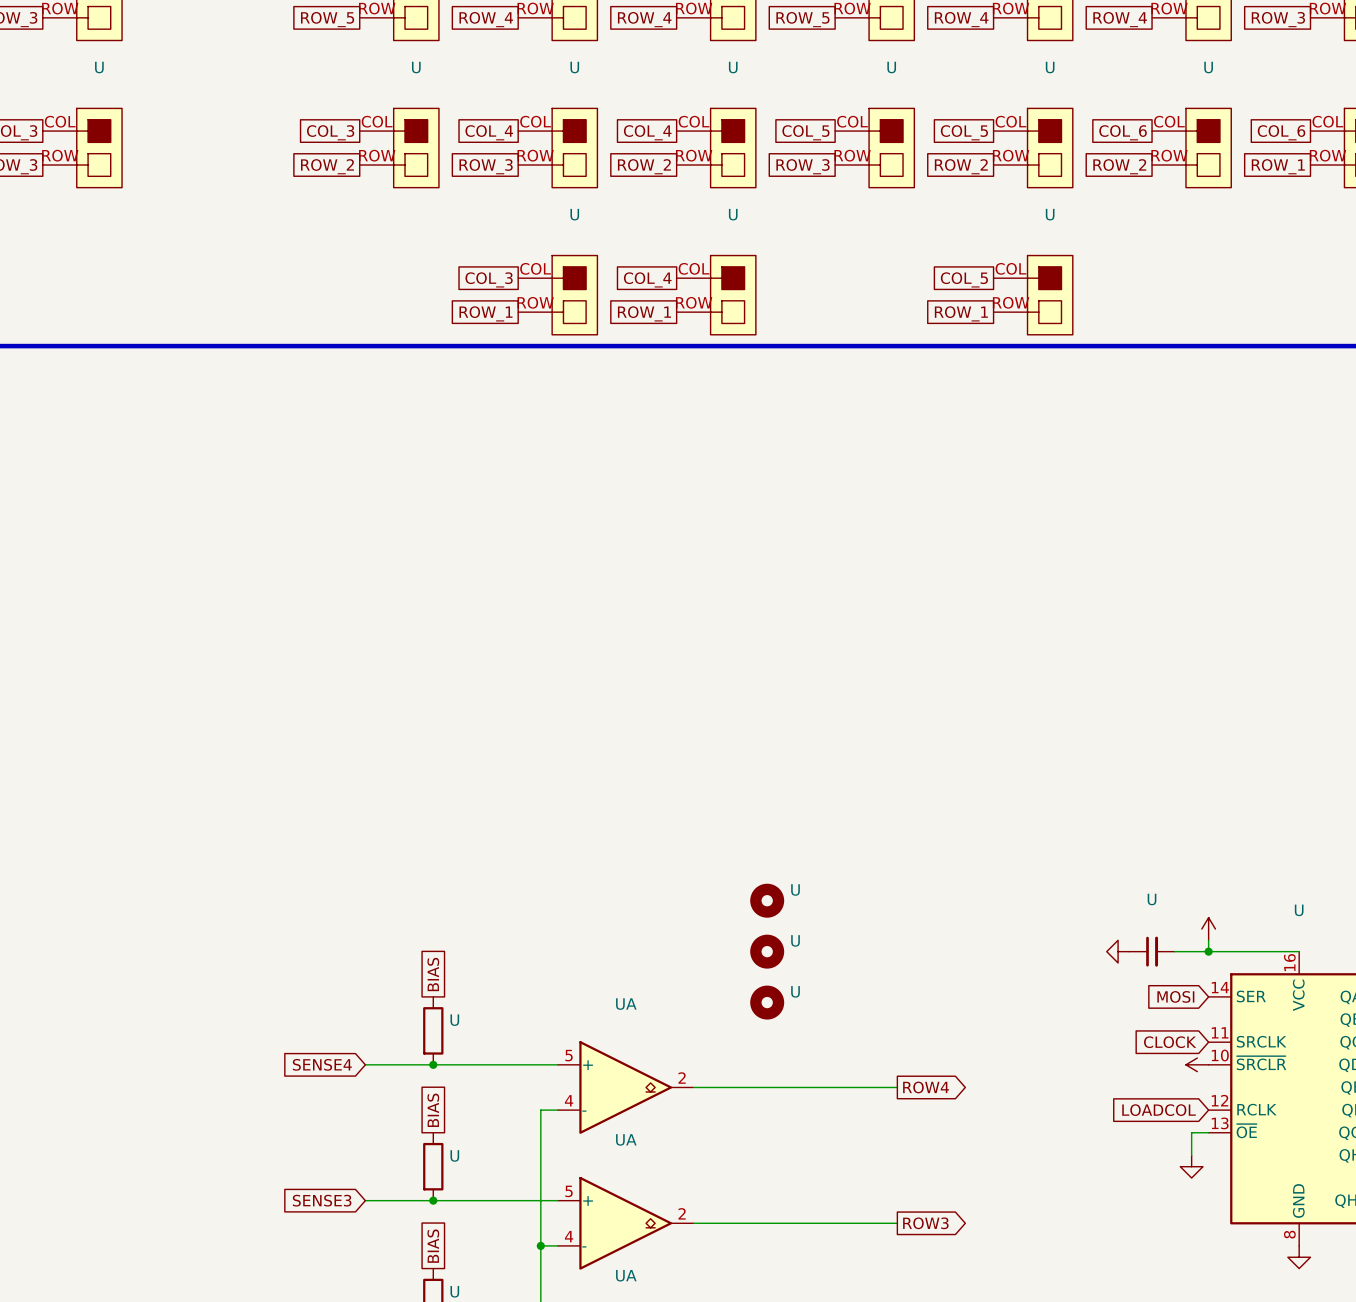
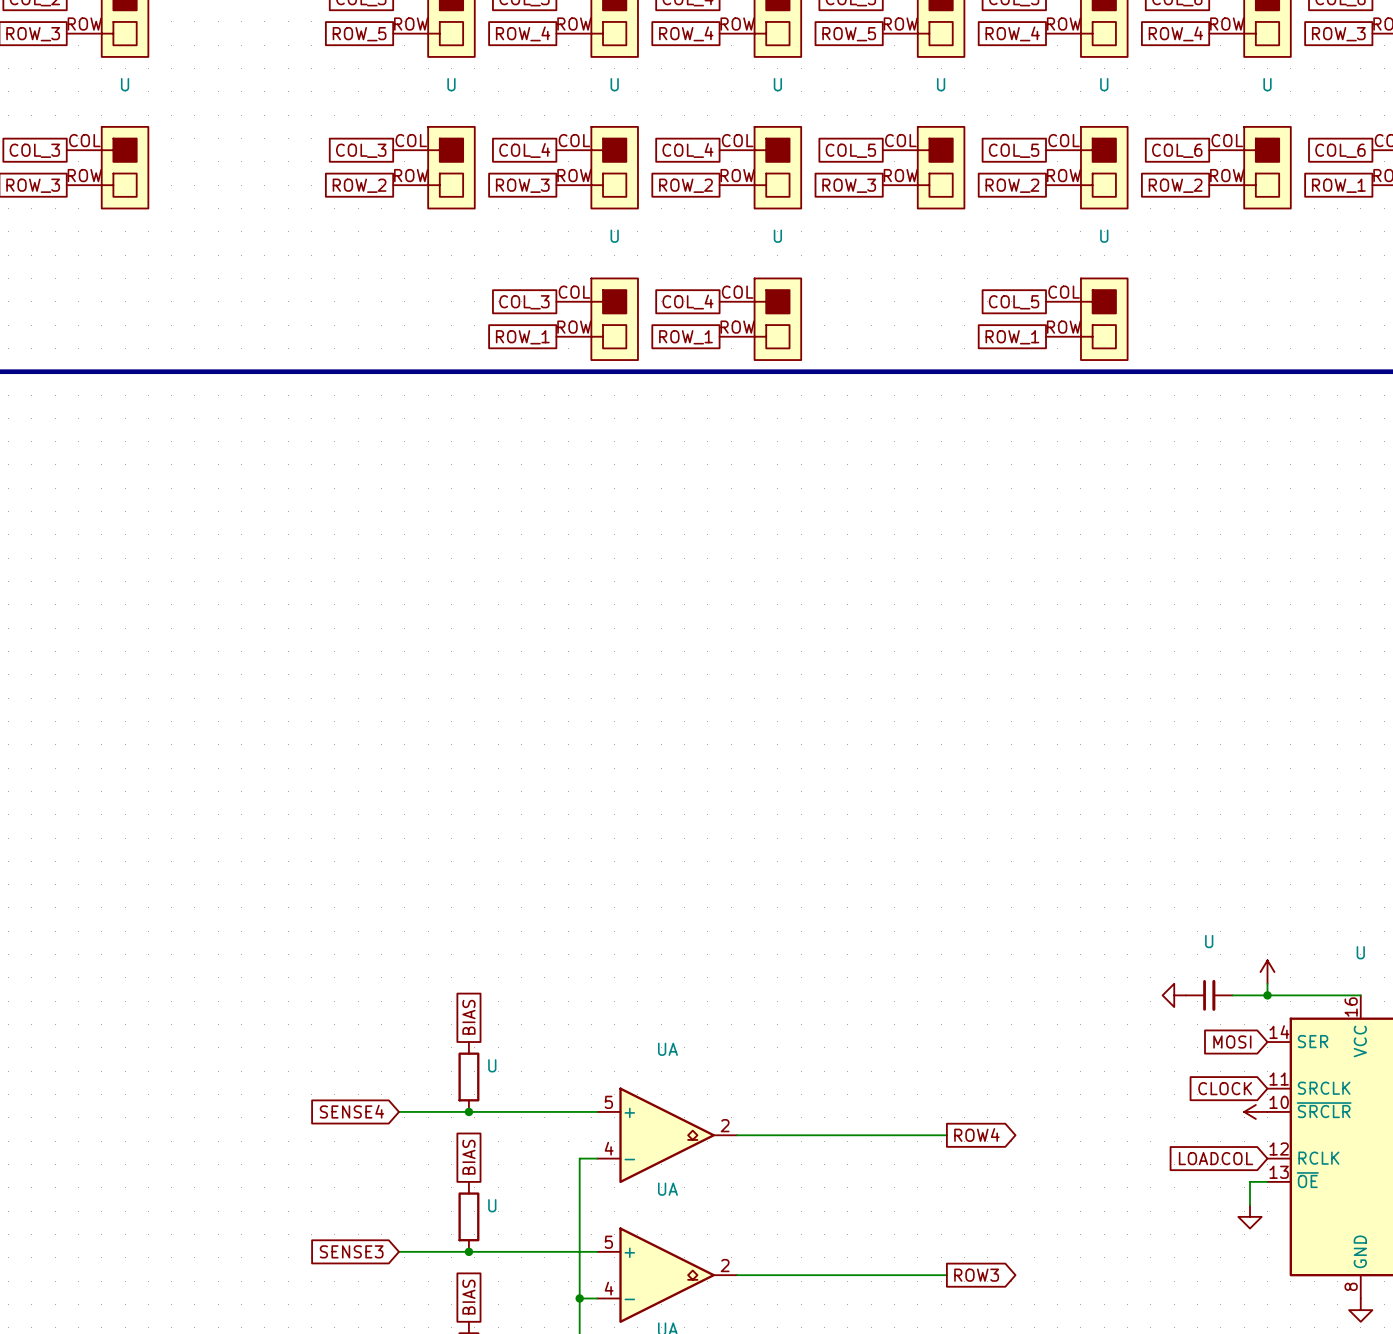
U: (767, 900) -> none
U: (767, 951) -> none
U: (767, 1002) -> none

